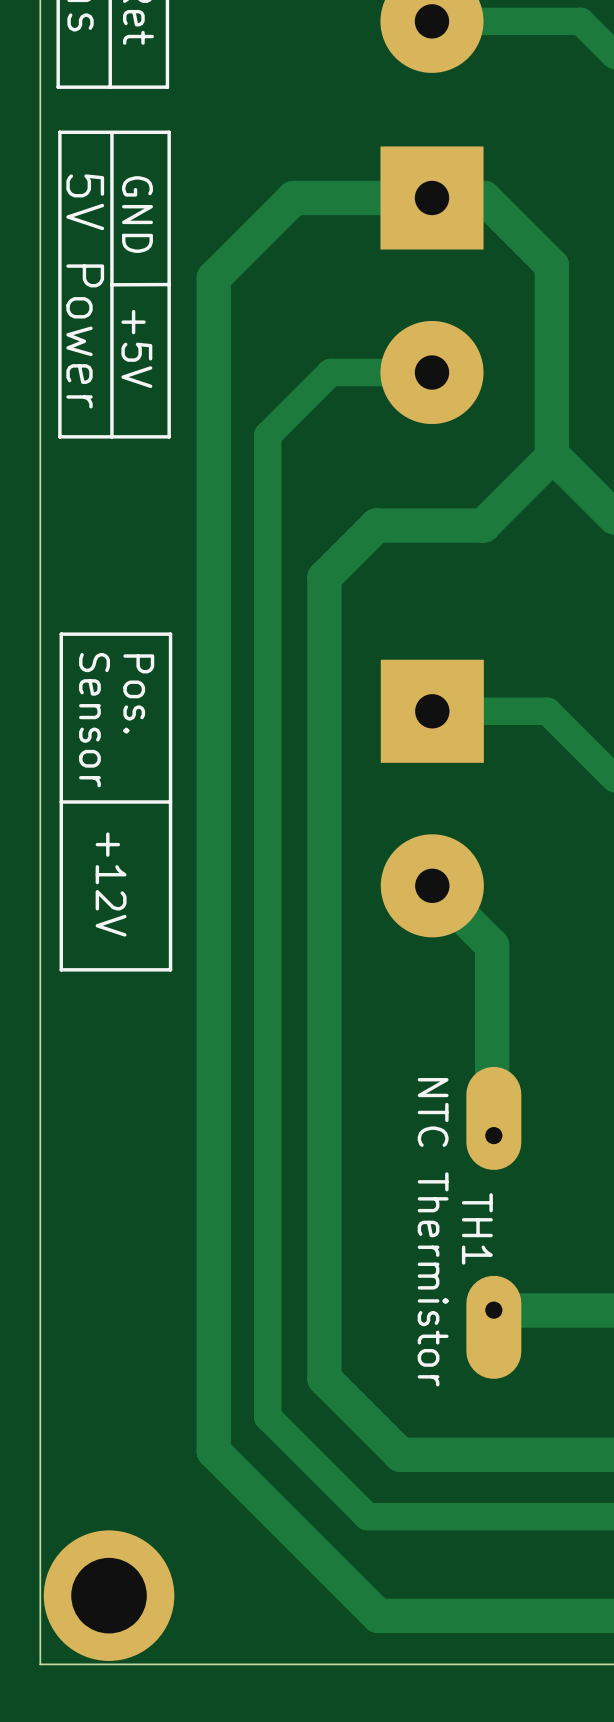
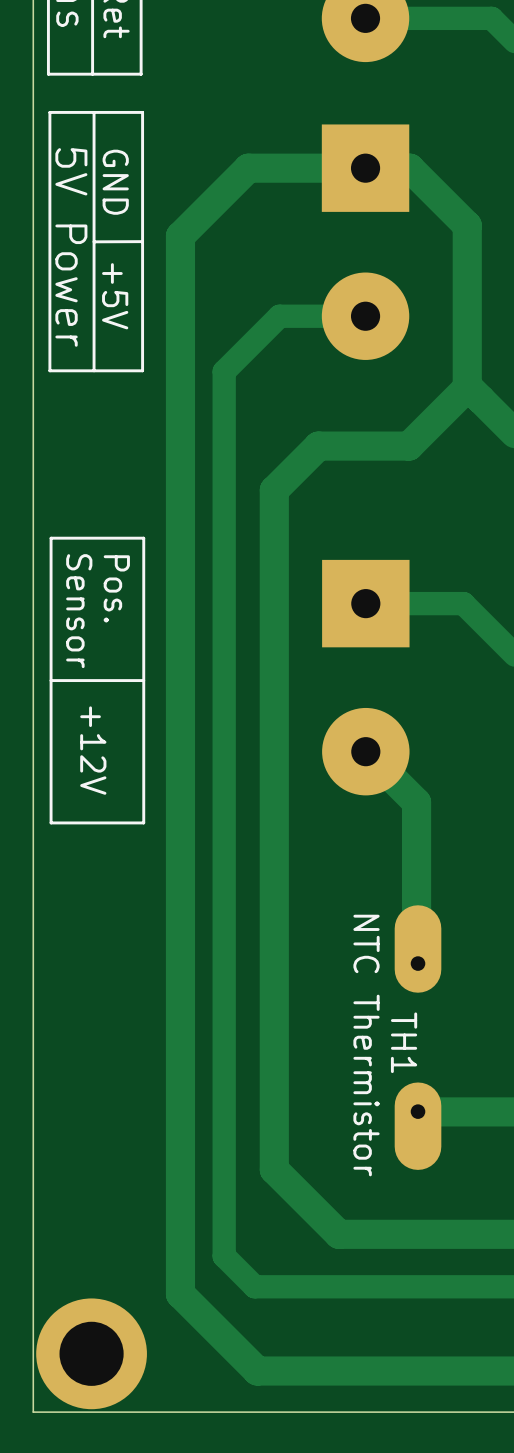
track: (267, 435) (267, 1417) (367, 1516) -> (226, 369) (224, 371) (224, 1256) (254, 1286) (310, 1286)
track: (213, 1451) (378, 1615) -> (180, 1231) (180, 1294) (257, 1371) (320, 1371)

